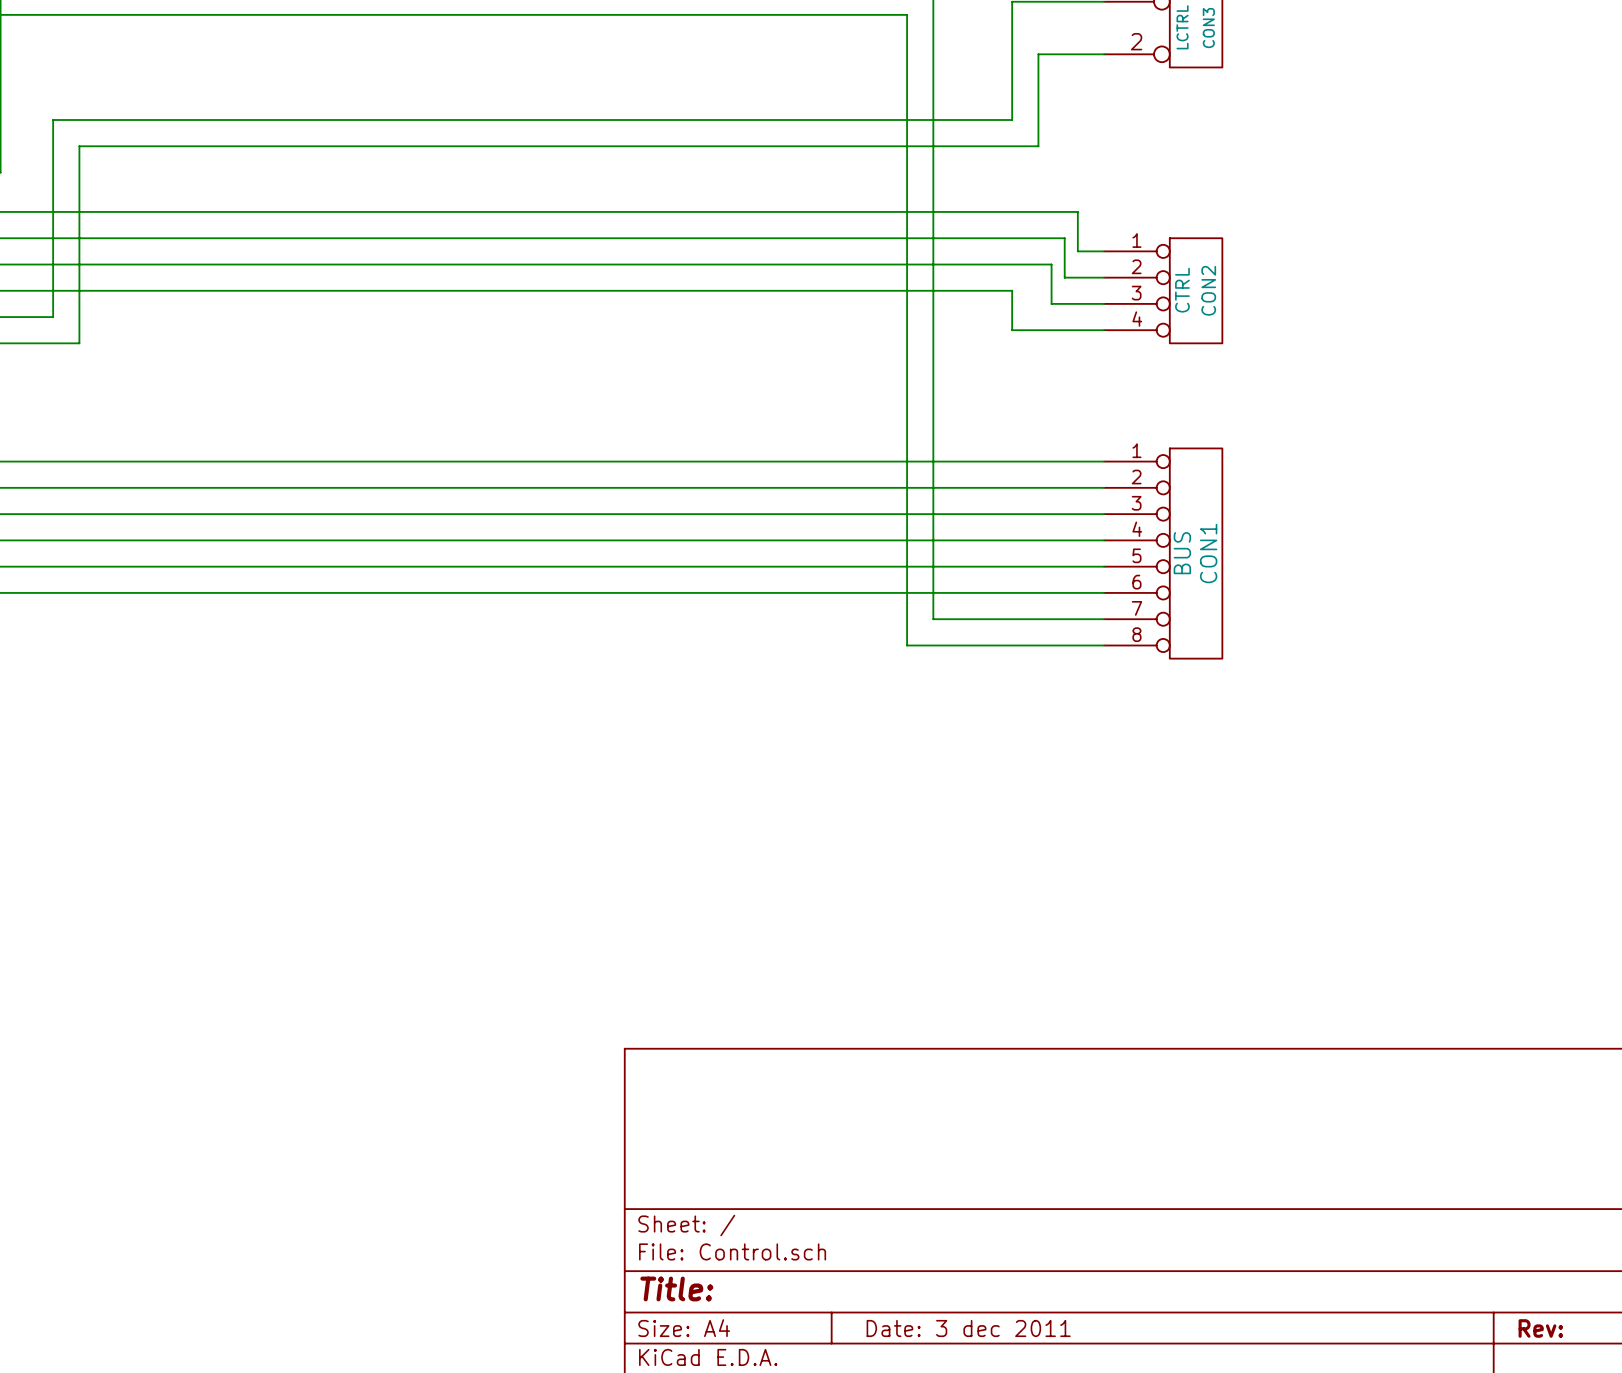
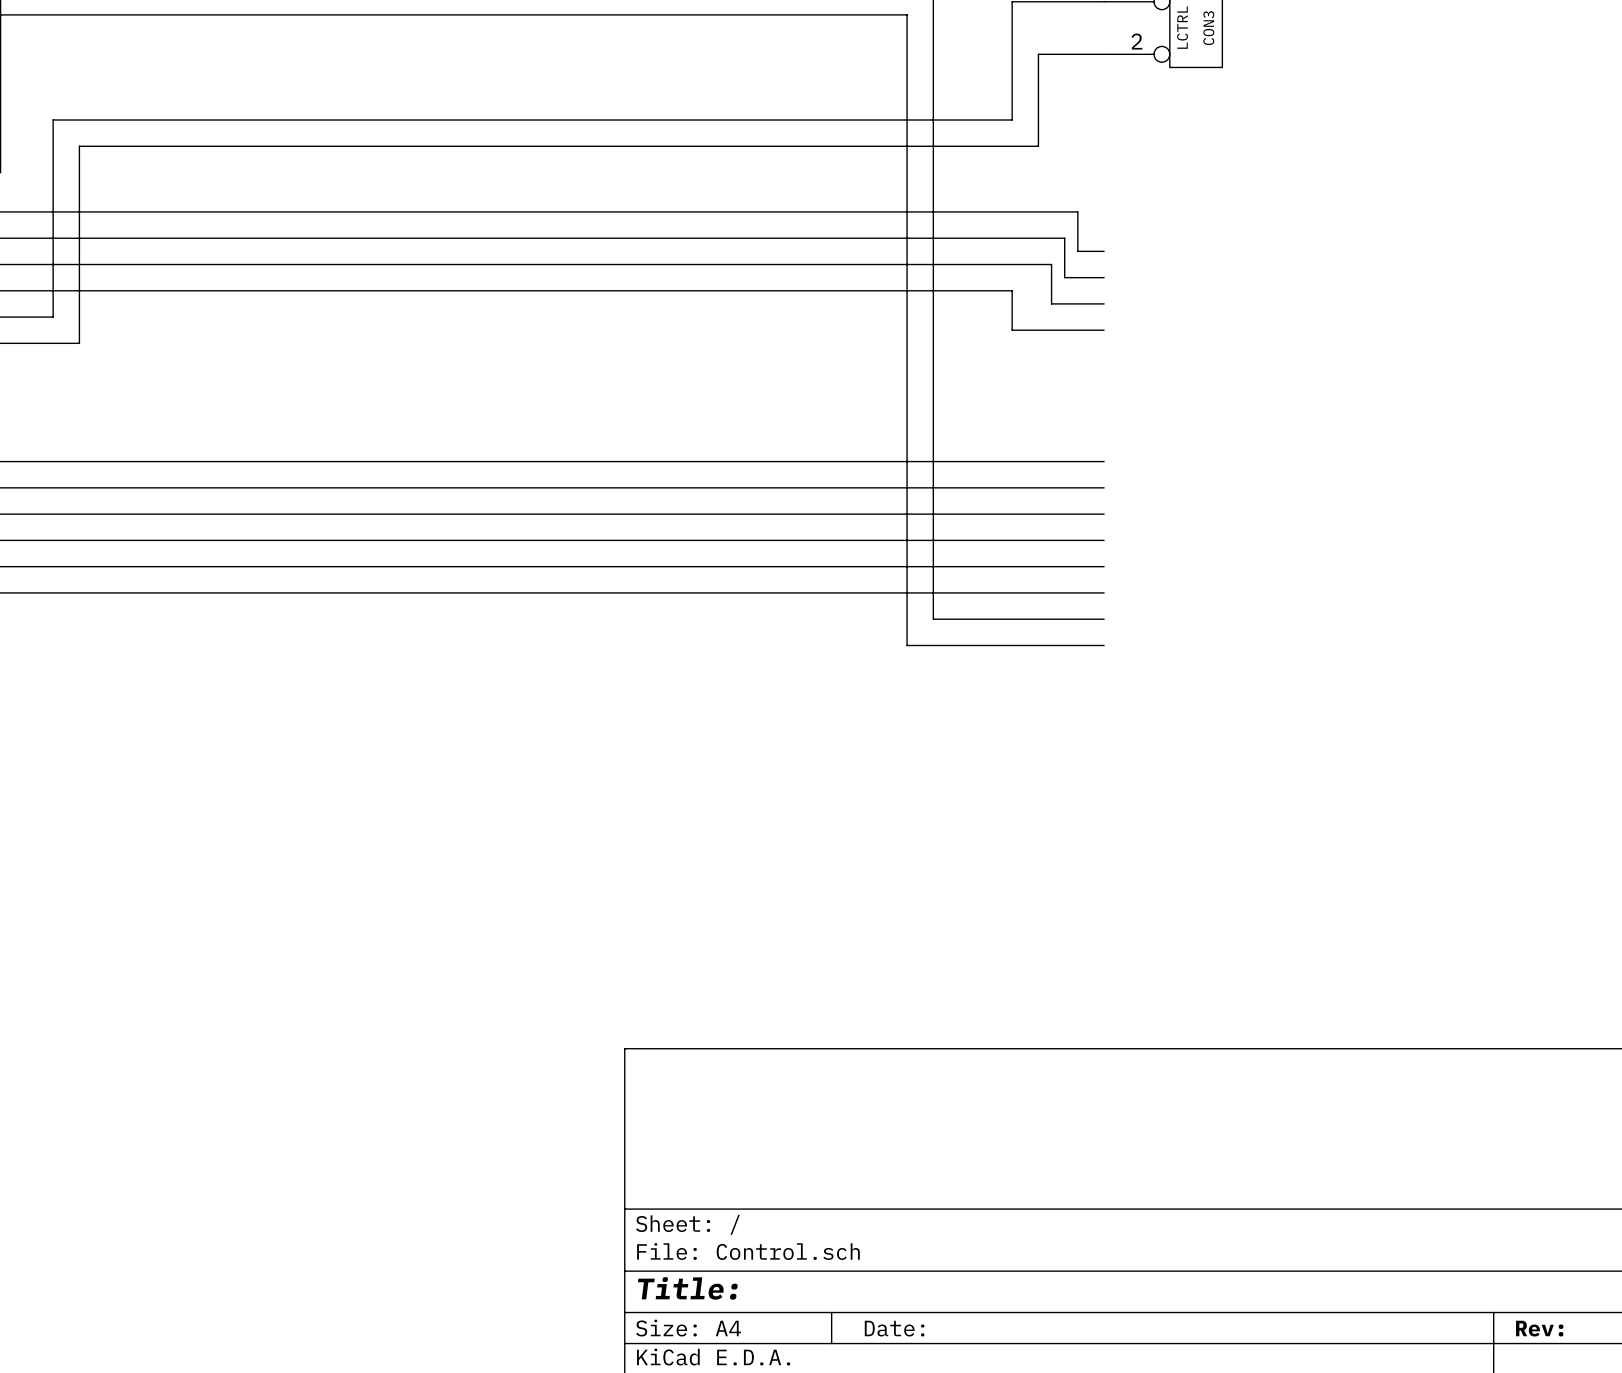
CTRL: CON2 (1163, 290) -> none
BUS: CON1 (1163, 553) -> none
title block: Date: 3 dec 2011 (968, 1328) -> Date: (894, 1328)

